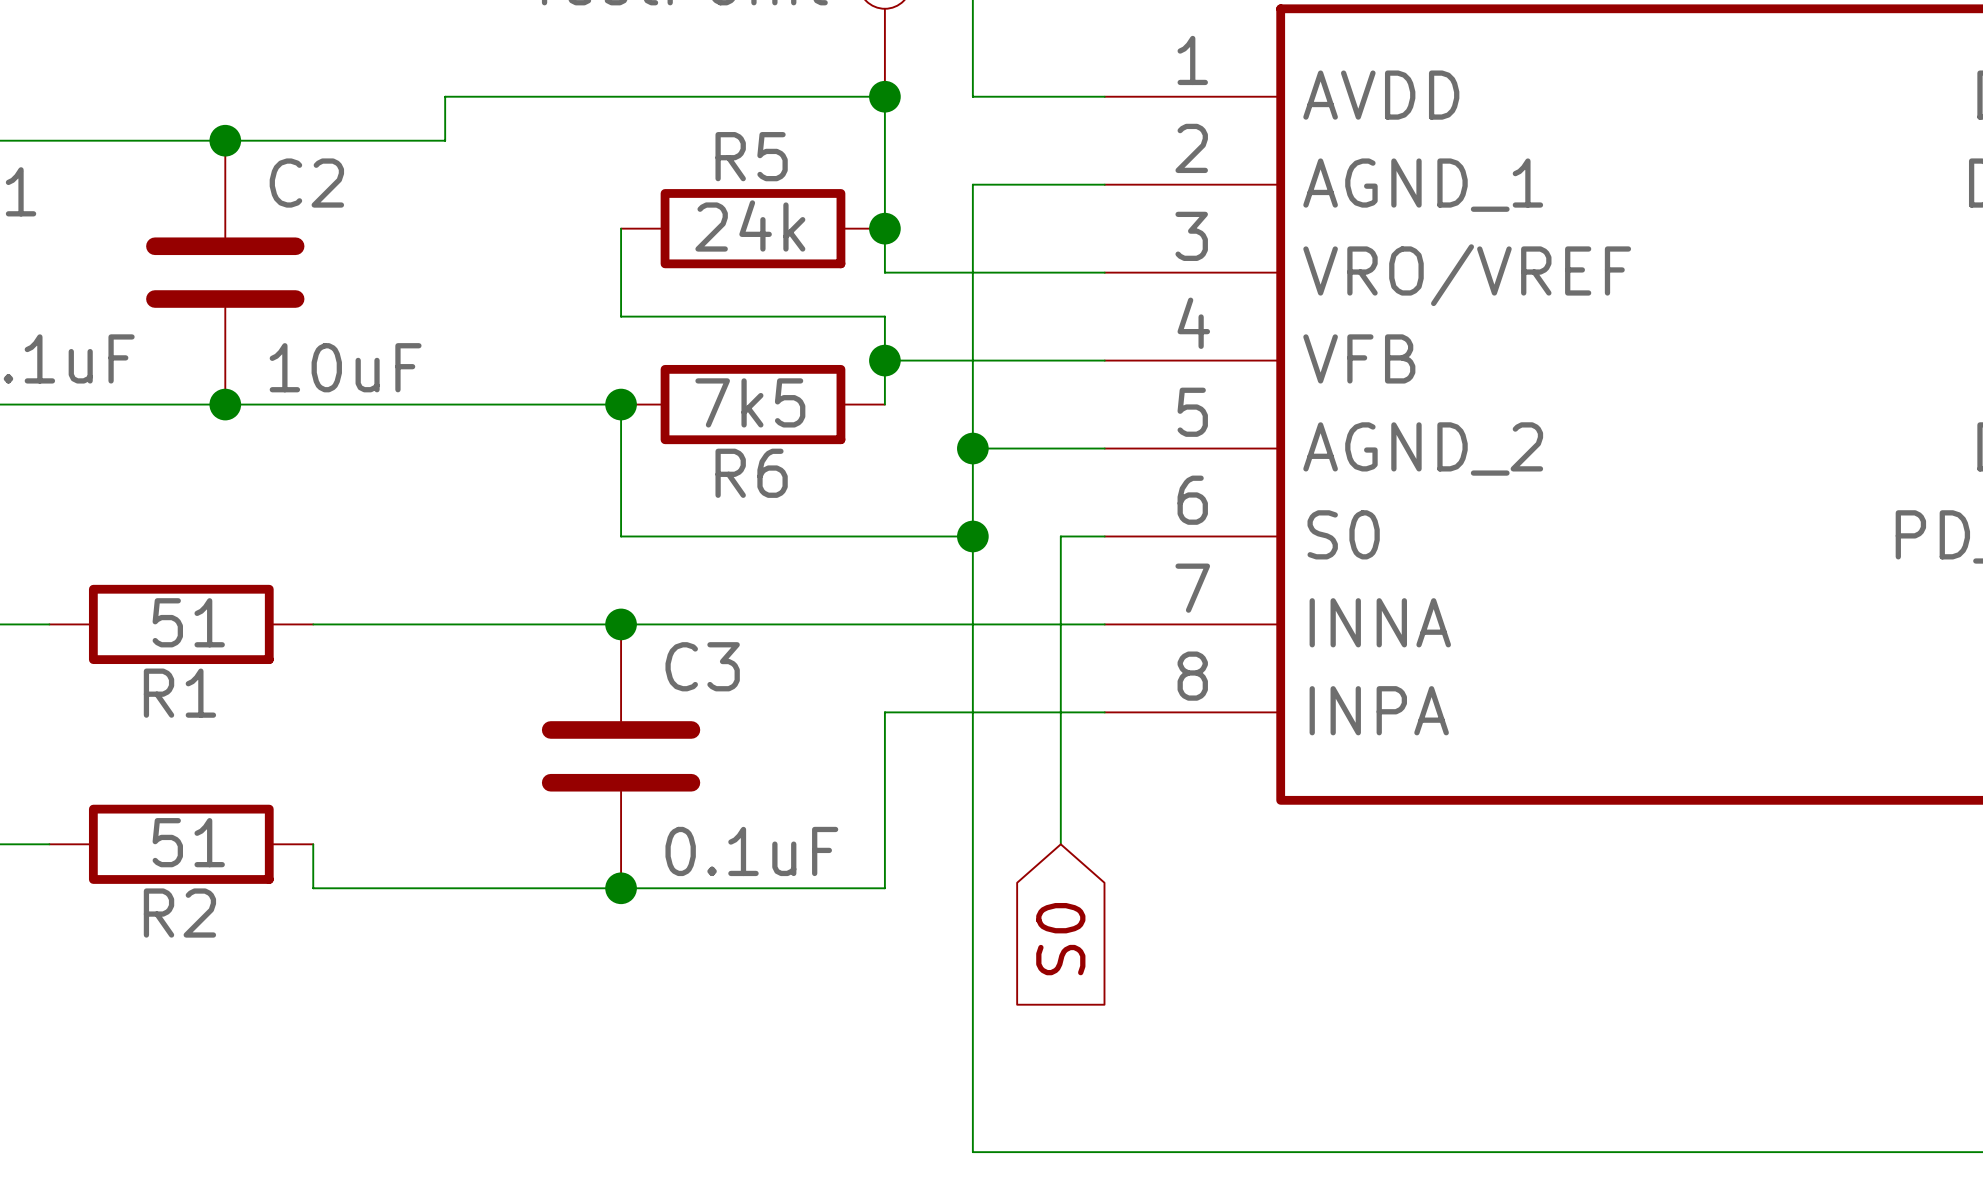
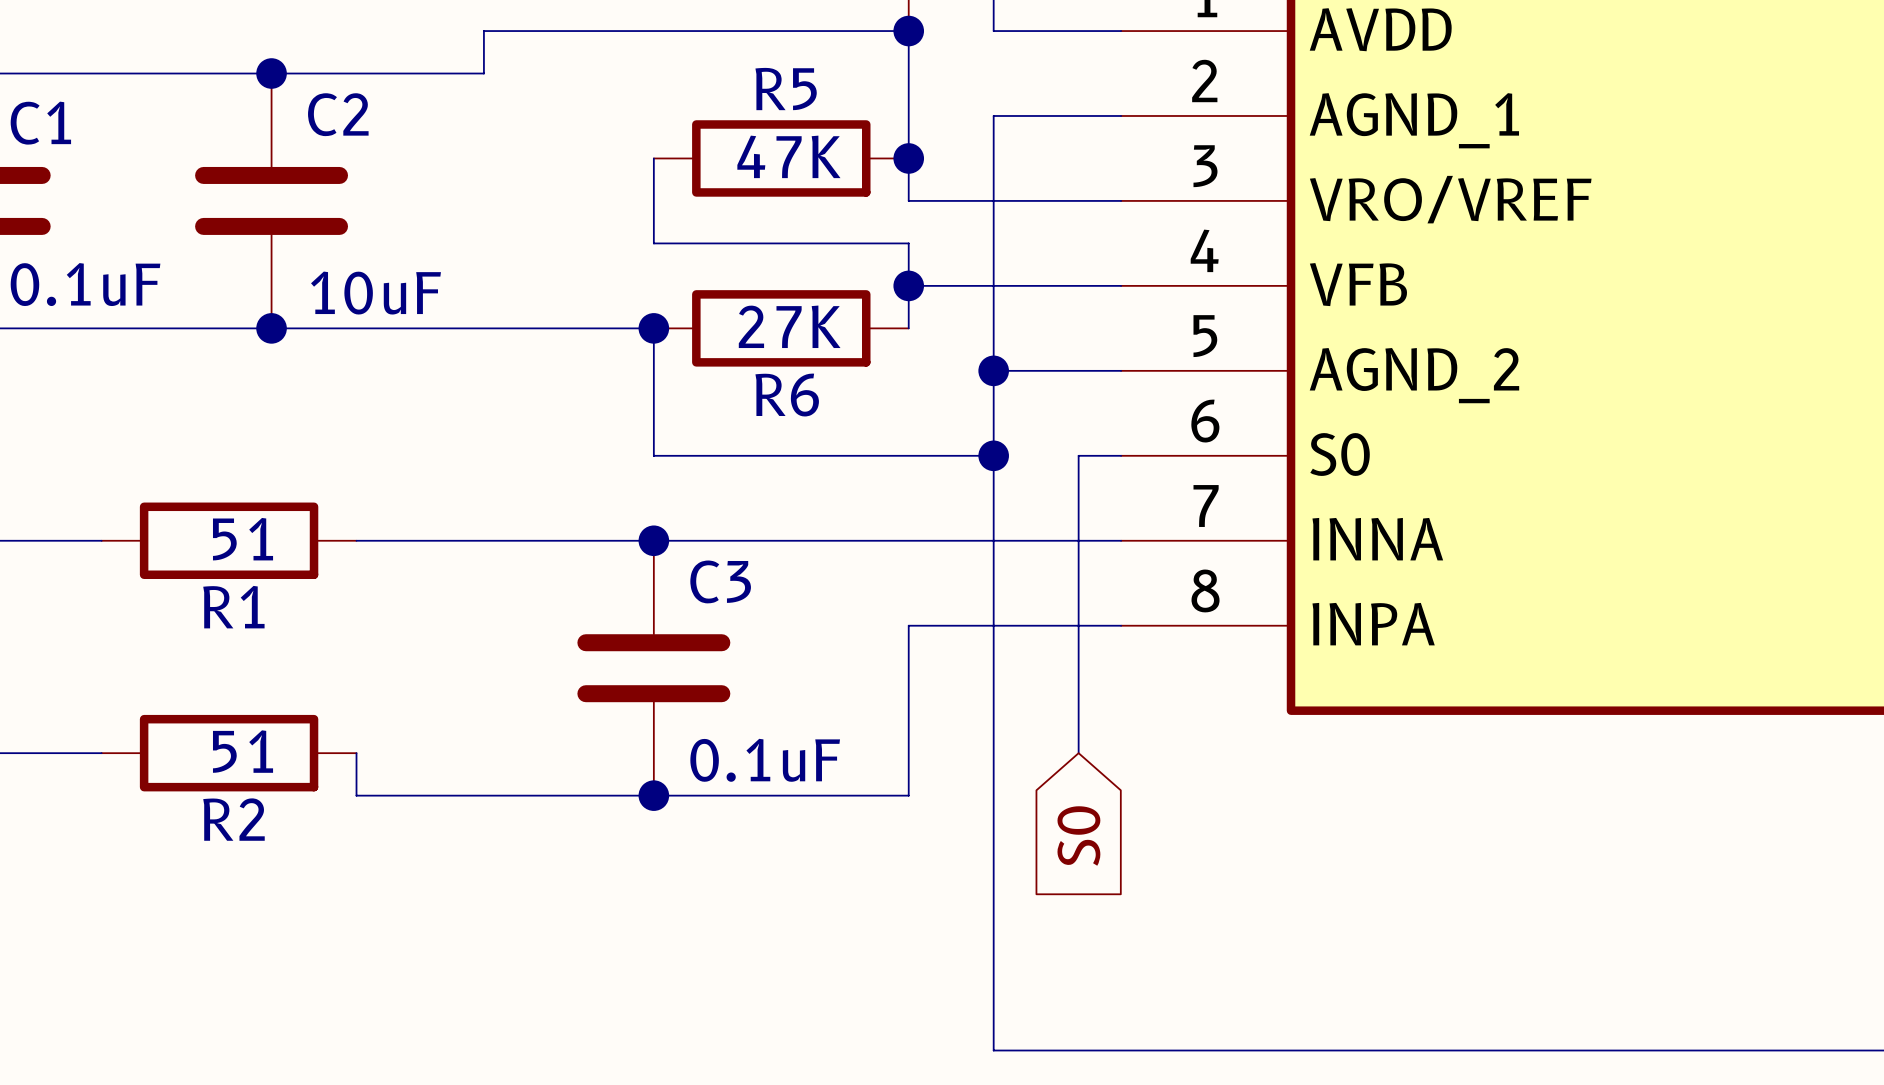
R5 value: 24k (750, 225) -> 47K (788, 156)
R6 value: 7k5 (750, 402) -> 27K (789, 326)

